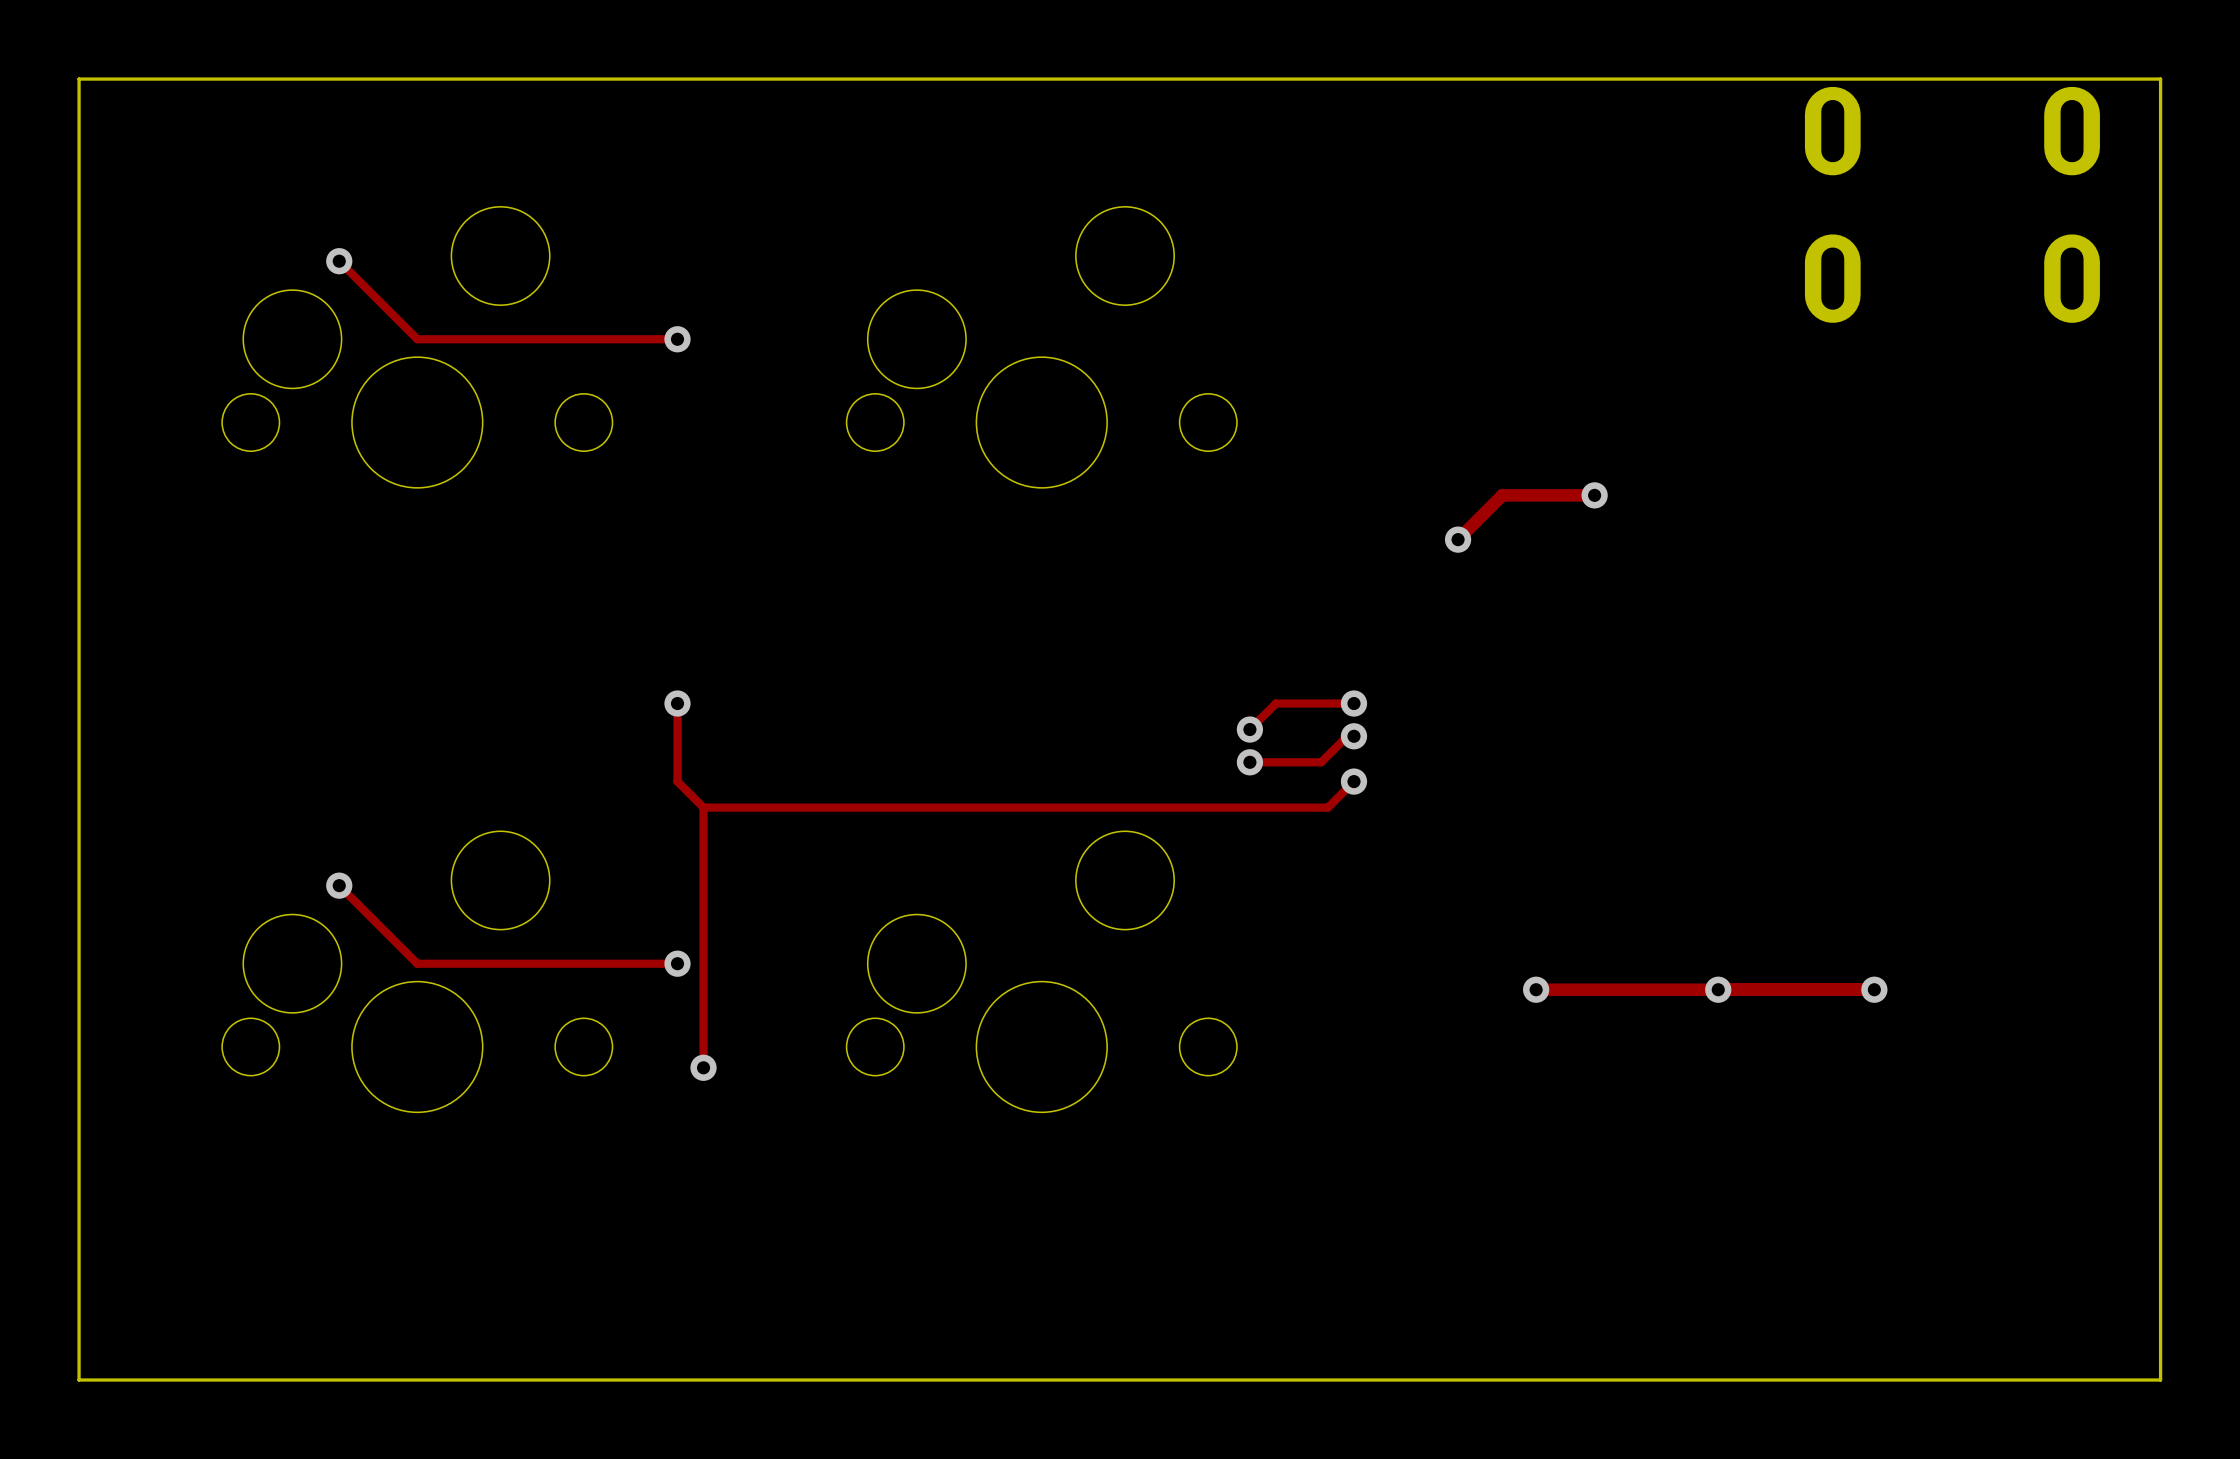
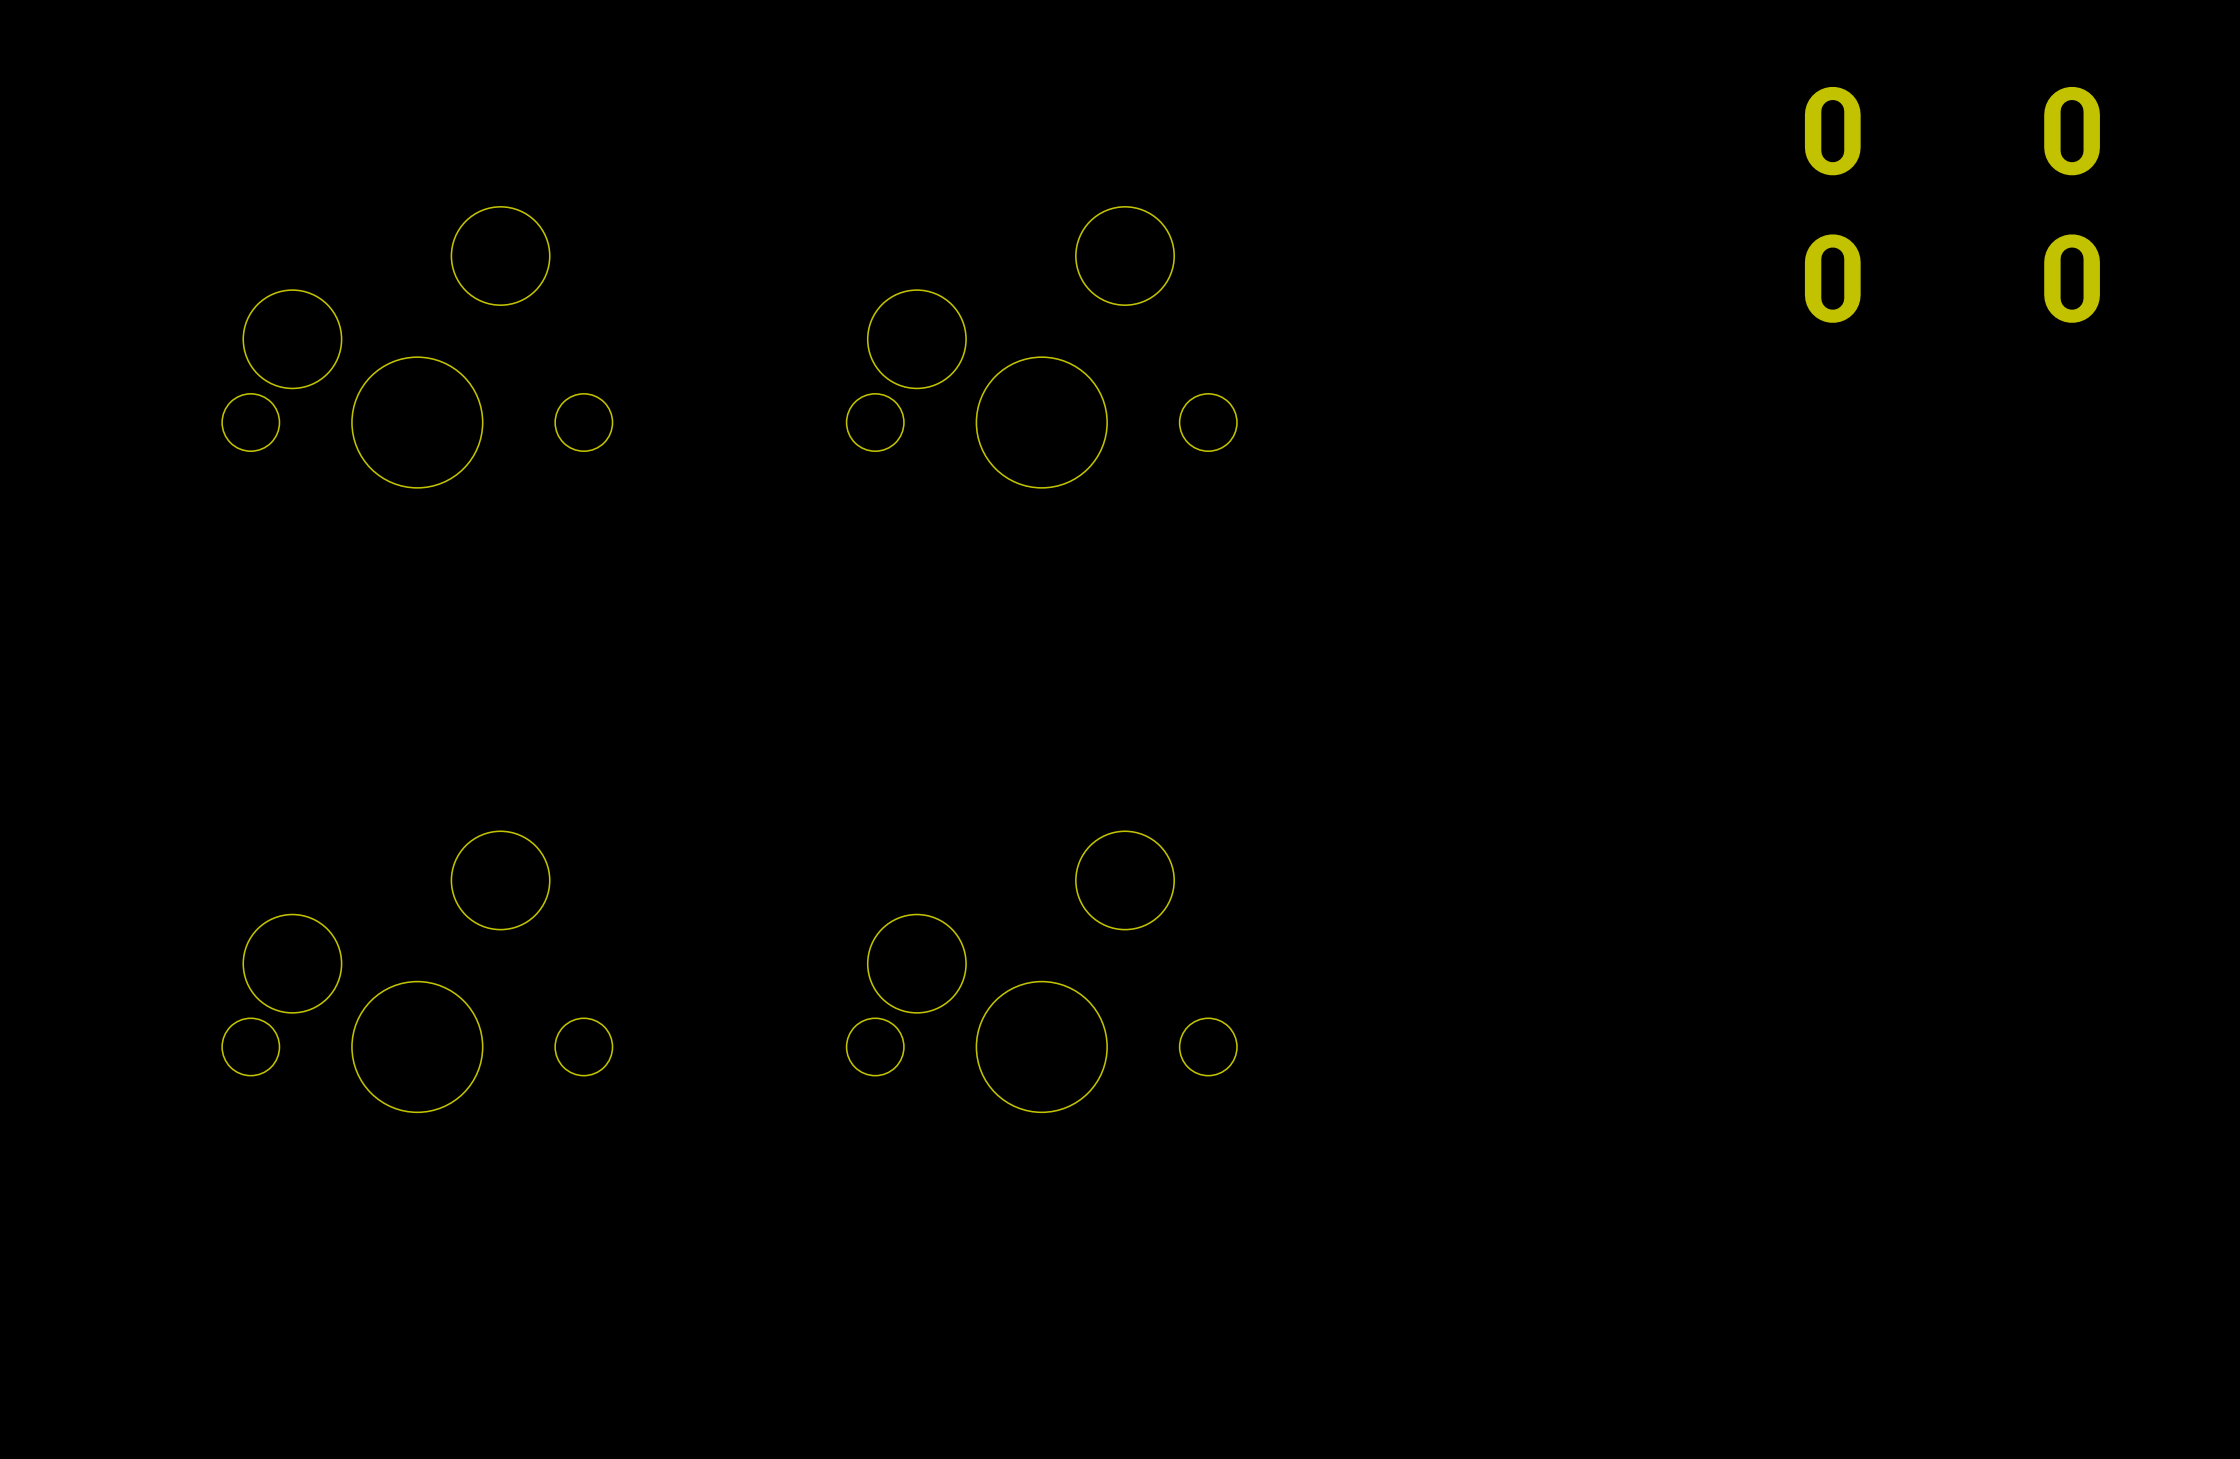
board edge: (79, 79) (2160, 79) (2160, 1380) (79, 1380) (79, 79) -> none
track: (339, 261) (417, 339) (677, 339) -> none
via: (339, 261) -> none
via: (677, 339) -> none
track: (1594, 495) (1502, 495) (1458, 539) -> none
via: (1594, 495) -> none
via: (1458, 539) -> none
track: (677, 703) (677, 781) (703, 807) -> none
via: (677, 703) -> none
track: (1353, 703) (1275, 703) (1249, 729) -> none
via: (1353, 703) -> none
via: (1249, 729) -> none
track: (1353, 736) (1353, 729) (1321, 762) (1249, 762) -> none
via: (1353, 736) -> none
via: (1249, 762) -> none
track: (1353, 781) (1327, 807) (703, 807) -> none
via: (1353, 781) -> none
track: (703, 807) (703, 1067) -> none
track: (339, 885) (417, 963) (677, 963) -> none
via: (339, 885) -> none
via: (677, 963) -> none
track: (1536, 989) (1874, 989) -> none
via: (1536, 989) -> none
via: (1718, 989) -> none
via: (1874, 989) -> none
via: (703, 1067) -> none

